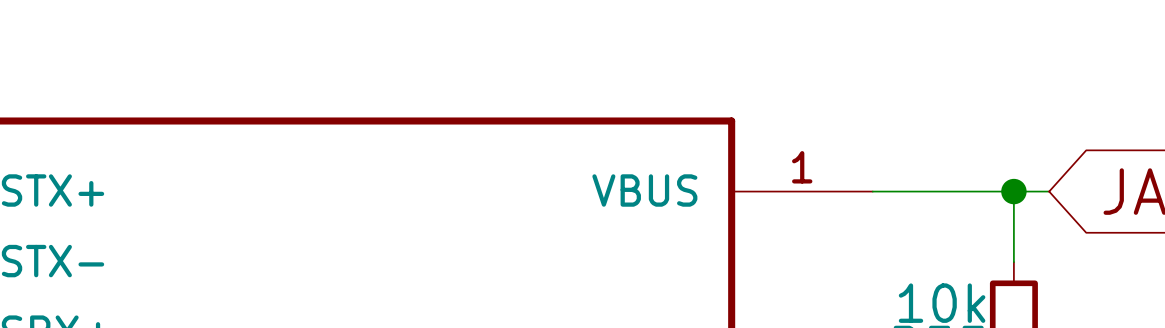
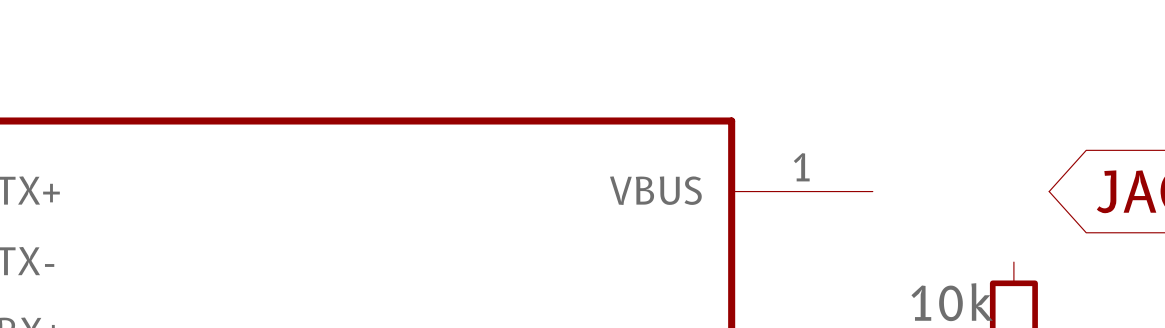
wire: (872, 191) (1049, 191) -> none
wire: (1013, 191) (1013, 262) -> none
junction: (1013, 191) -> none

